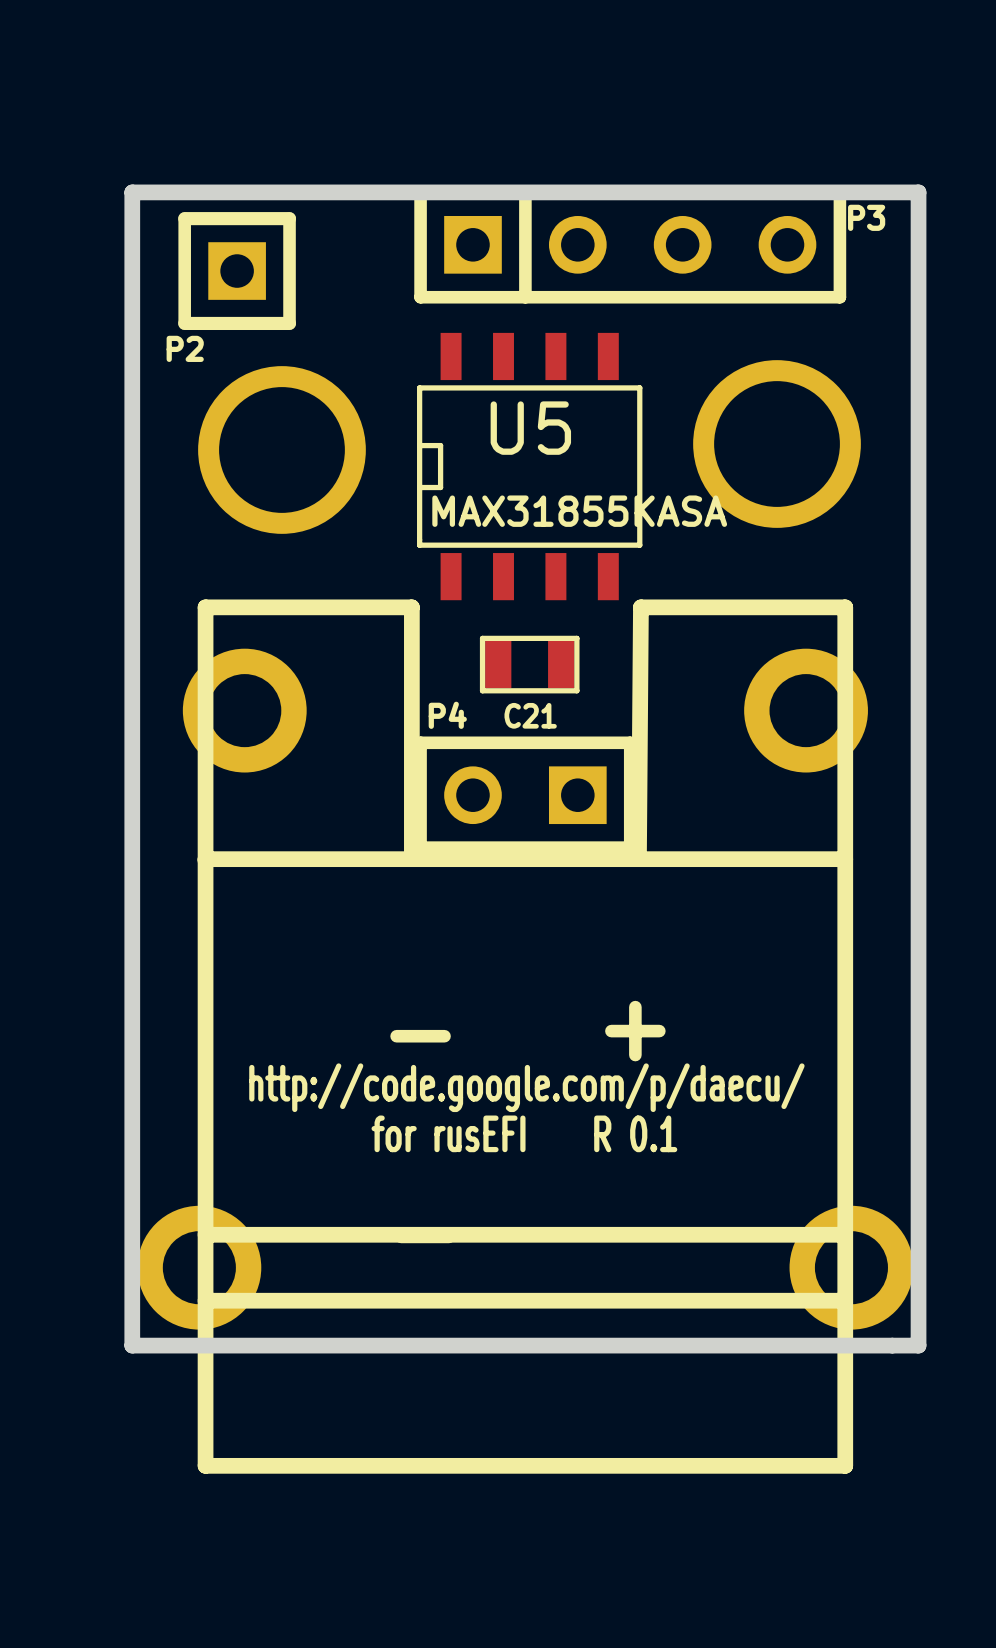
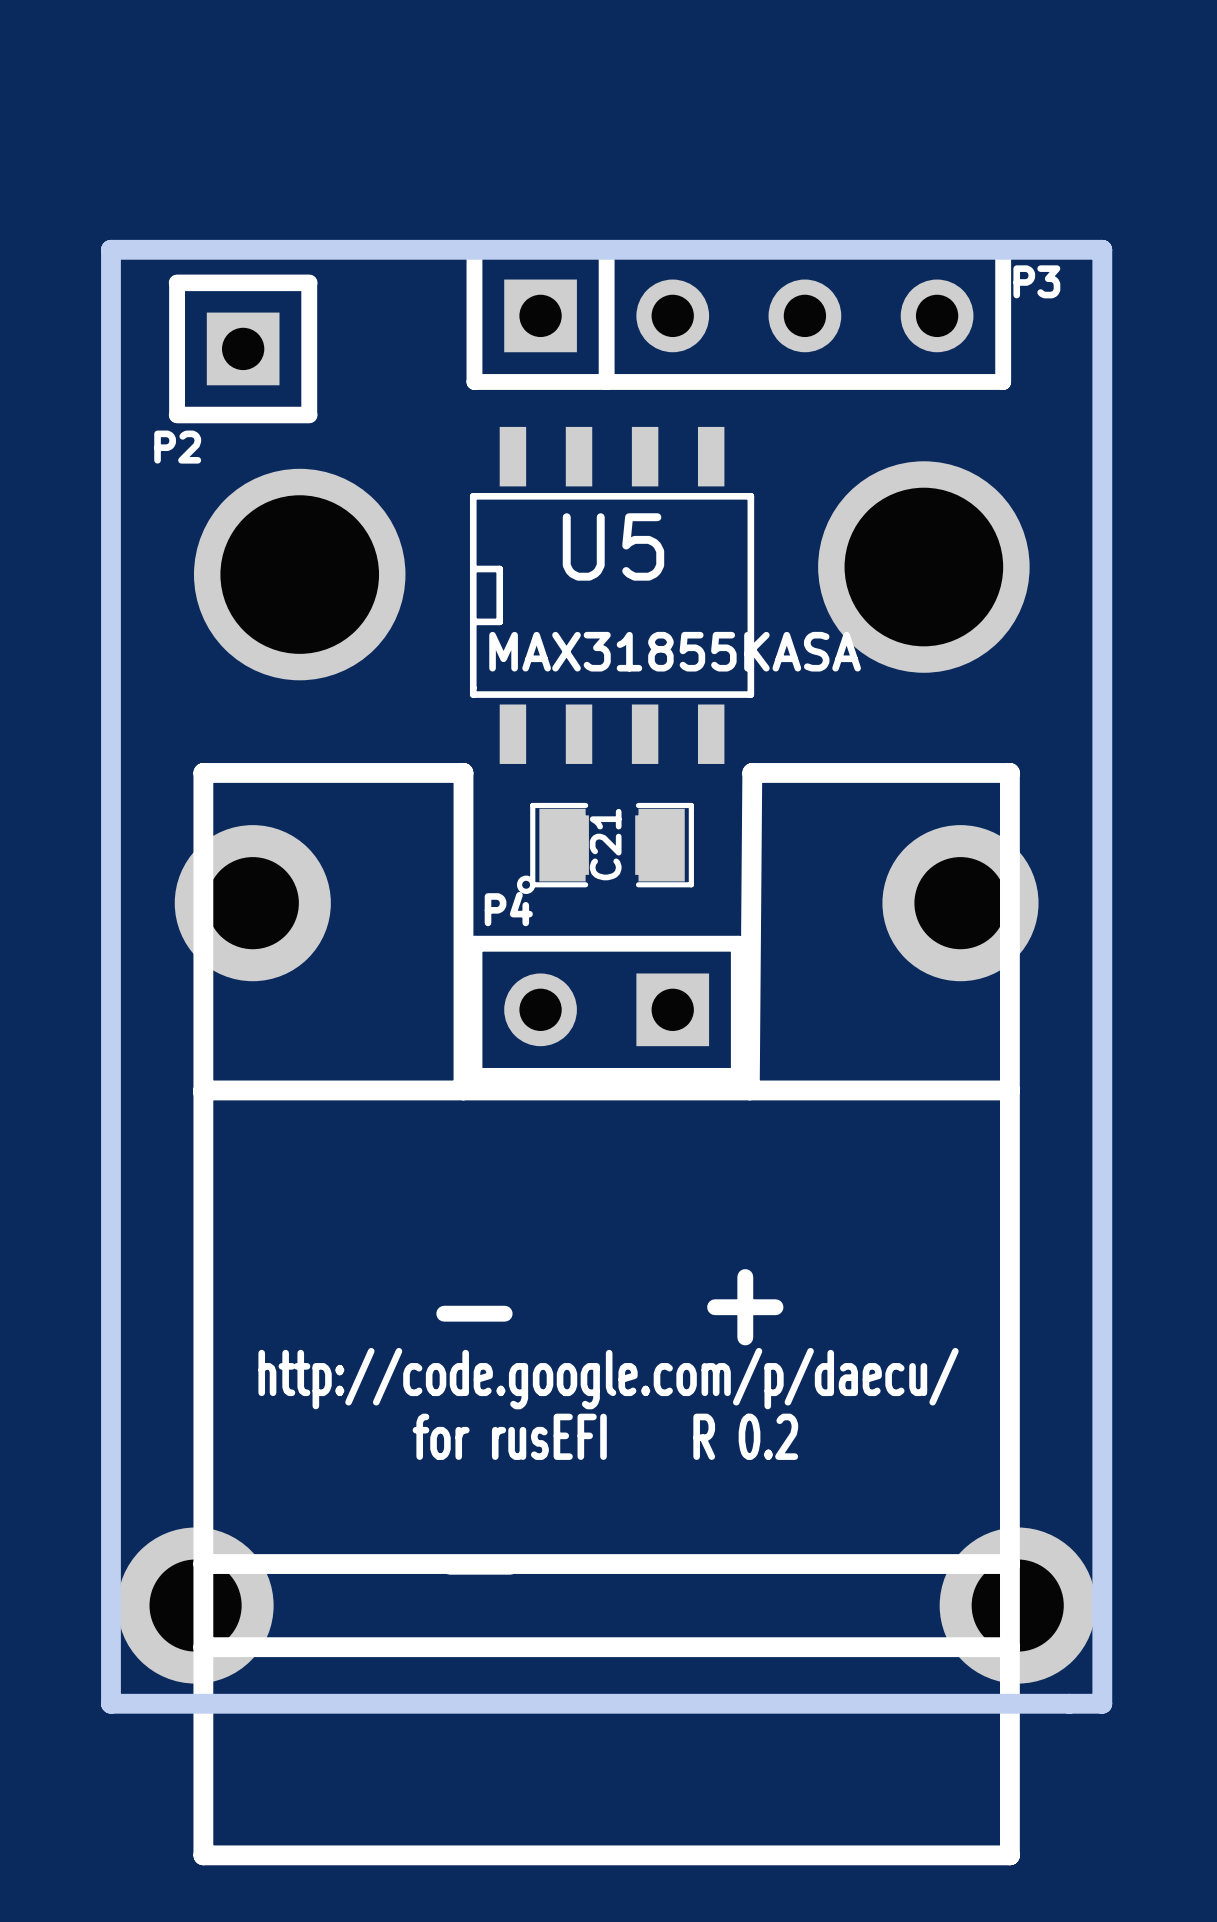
C21 footprint: [479, 635, 580, 694] -> [516, 802, 694, 894]
C21 name rotation: 0° (530, 715) -> 90° counterclockwise (605, 844)
text: for rusEFI R 0.1 (524, 1133) -> for rusEFI R 0.2 (605, 1436)

